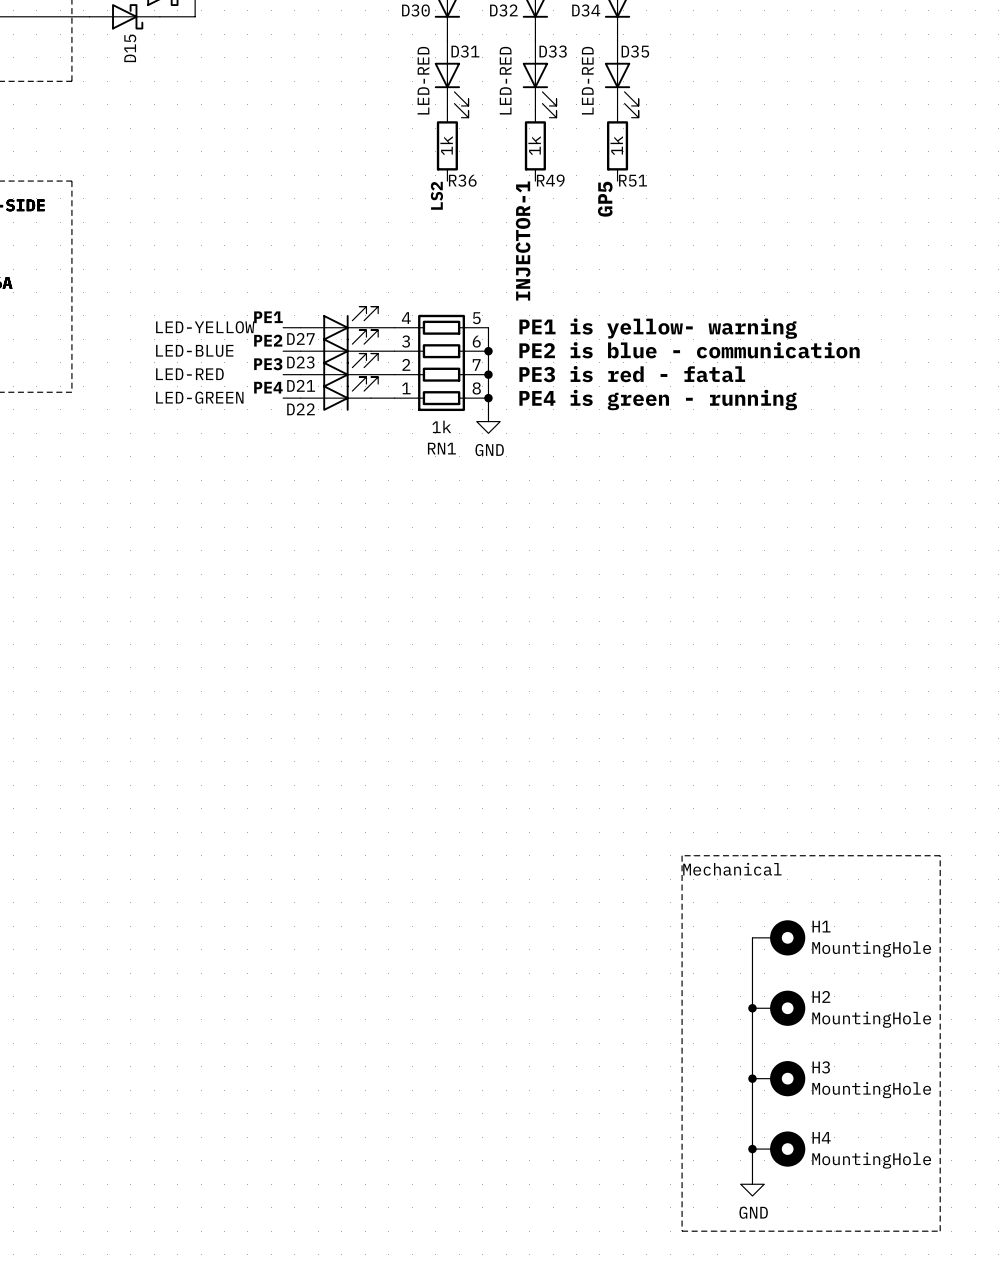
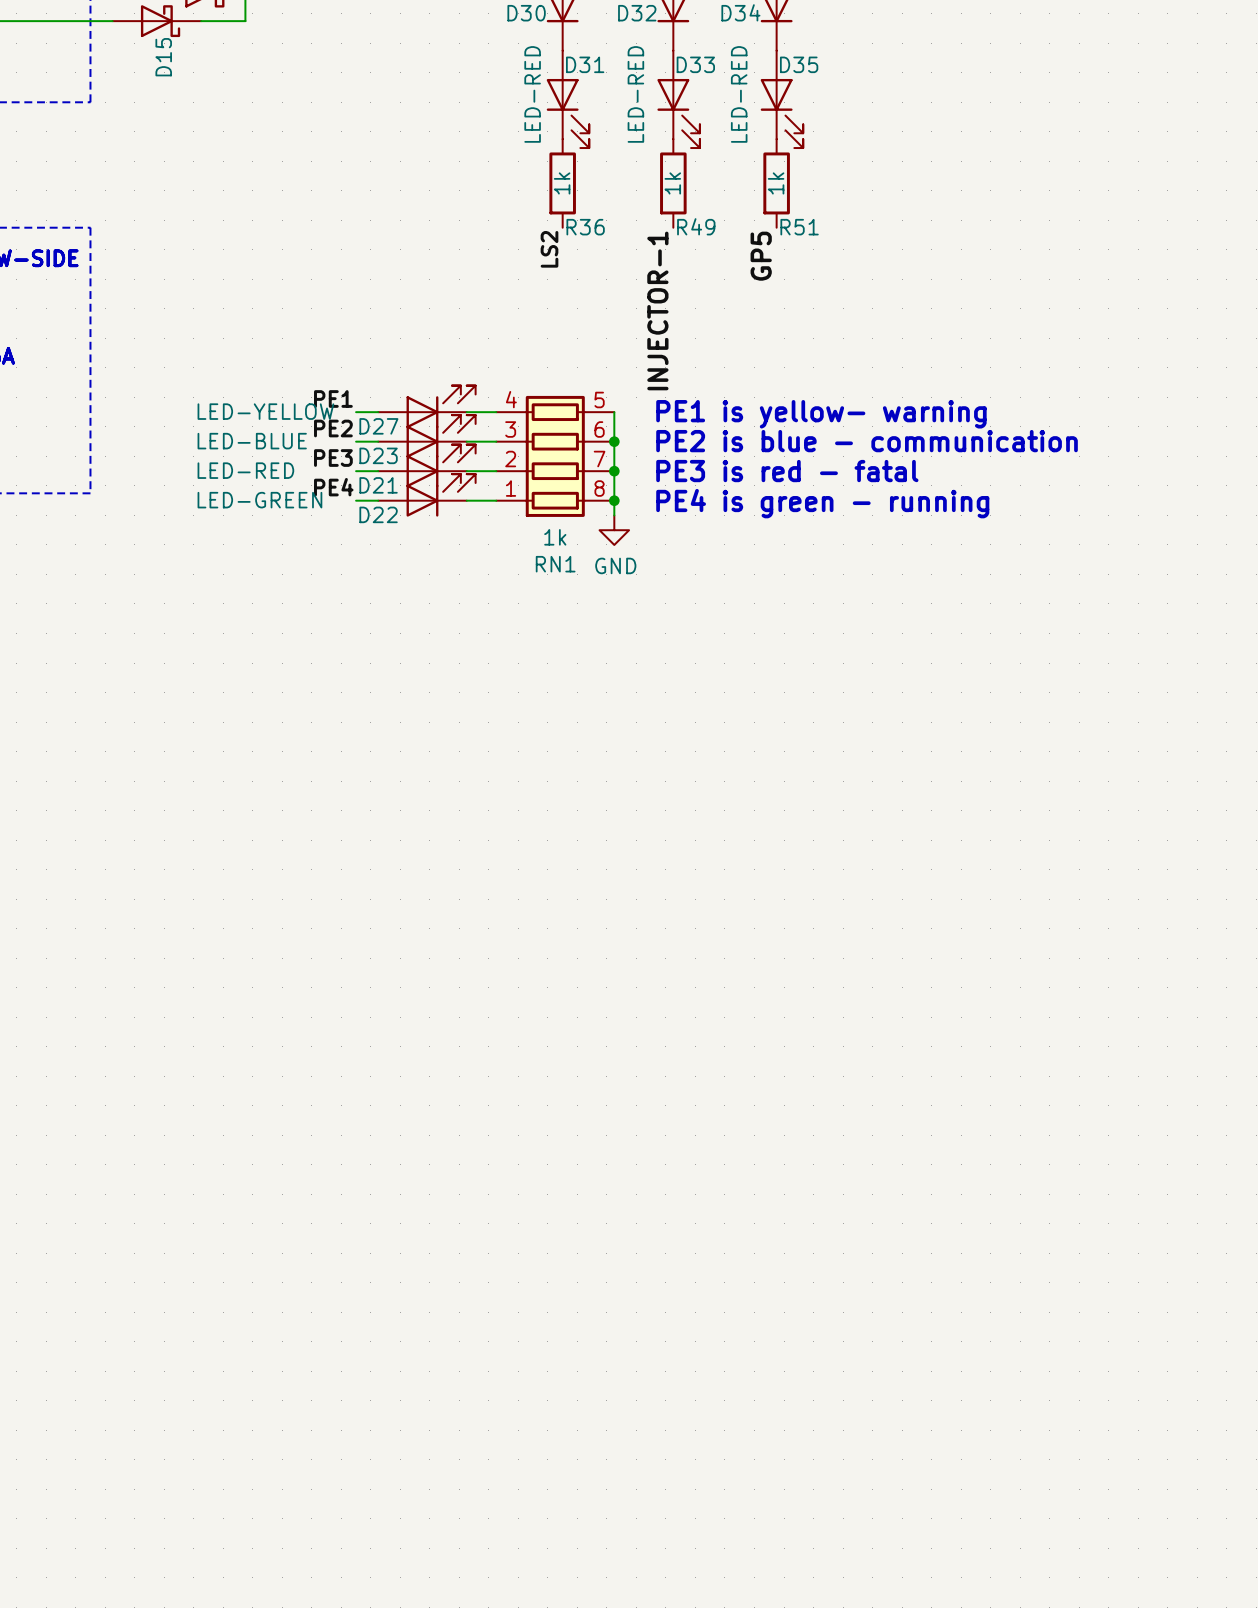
line: (682, 855) (682, 1231) (940, 1231) (940, 855) (682, 855) -> none
text: Mechanical (732, 869) -> none
wire: (752, 937) (752, 1172) -> none
H1: MountingHole (778, 937) -> none
junction: (752, 1008) -> none
H2: MountingHole (778, 1008) -> none
junction: (752, 1078) -> none
H3: MountingHole (778, 1078) -> none
junction: (752, 1149) -> none
H4: MountingHole (778, 1149) -> none
power symbol: GND (752, 1184) -> none

